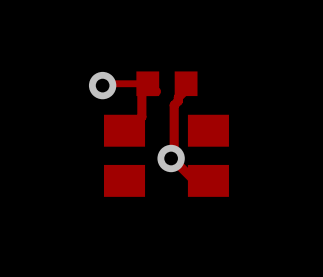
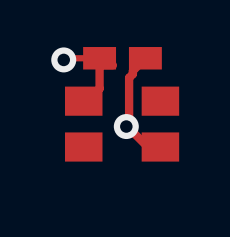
part footprint: [136, 71, 198, 97] -> [83, 47, 162, 70]

